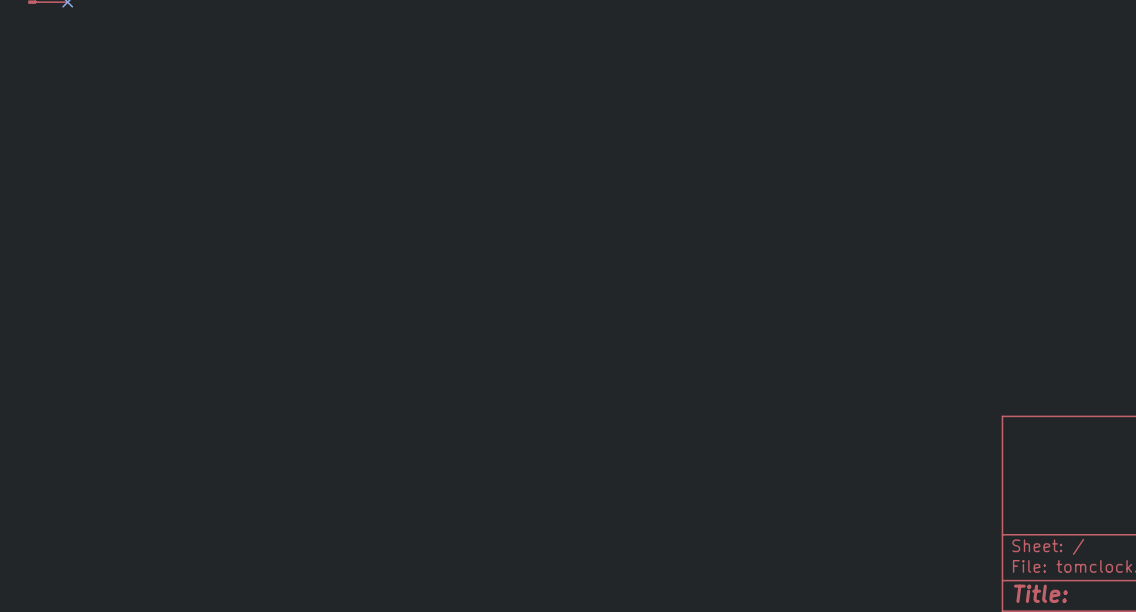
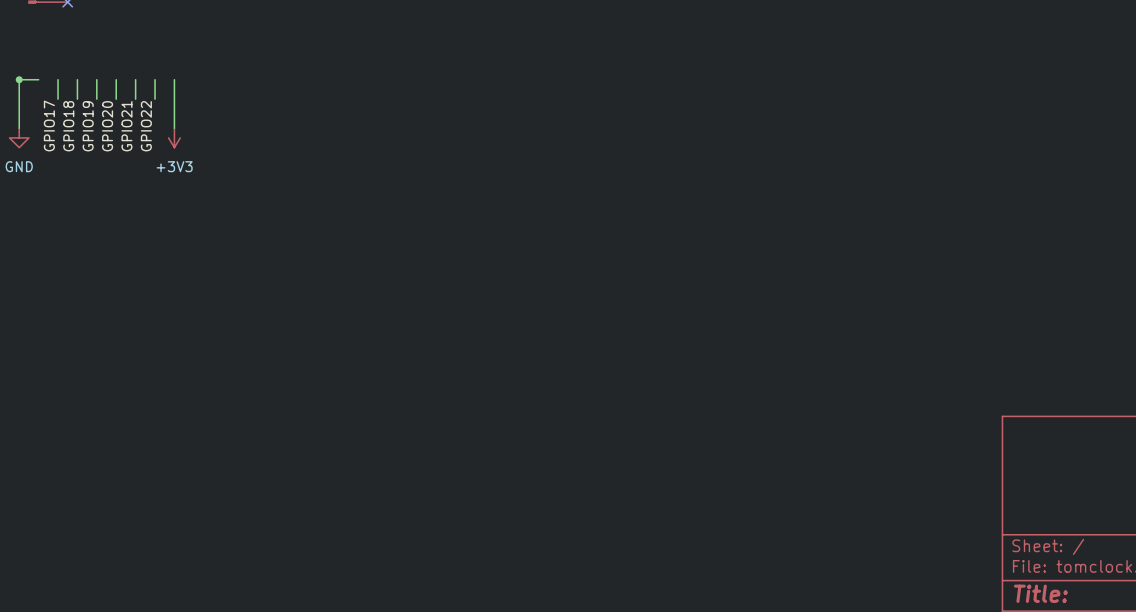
junction: none -> (19, 79)
wire: none -> (38, 79) (19, 79) (19, 128)
wire: none -> (58, 79) (58, 99)
wire: none -> (77, 79) (77, 99)
wire: none -> (96, 79) (96, 99)
wire: none -> (116, 79) (116, 99)
wire: none -> (135, 79) (135, 99)
wire: none -> (155, 79) (155, 99)
wire: none -> (174, 79) (174, 128)
label: none -> GPIO17 (49, 126)
label: none -> GPIO18 (68, 126)
label: none -> GPIO19 (88, 126)
label: none -> GPIO20 (107, 126)
label: none -> GPIO21 (126, 126)
label: none -> GPIO22 (146, 126)
power symbol: none -> GND (19, 137)
power symbol: none -> +3V3 (174, 137)

